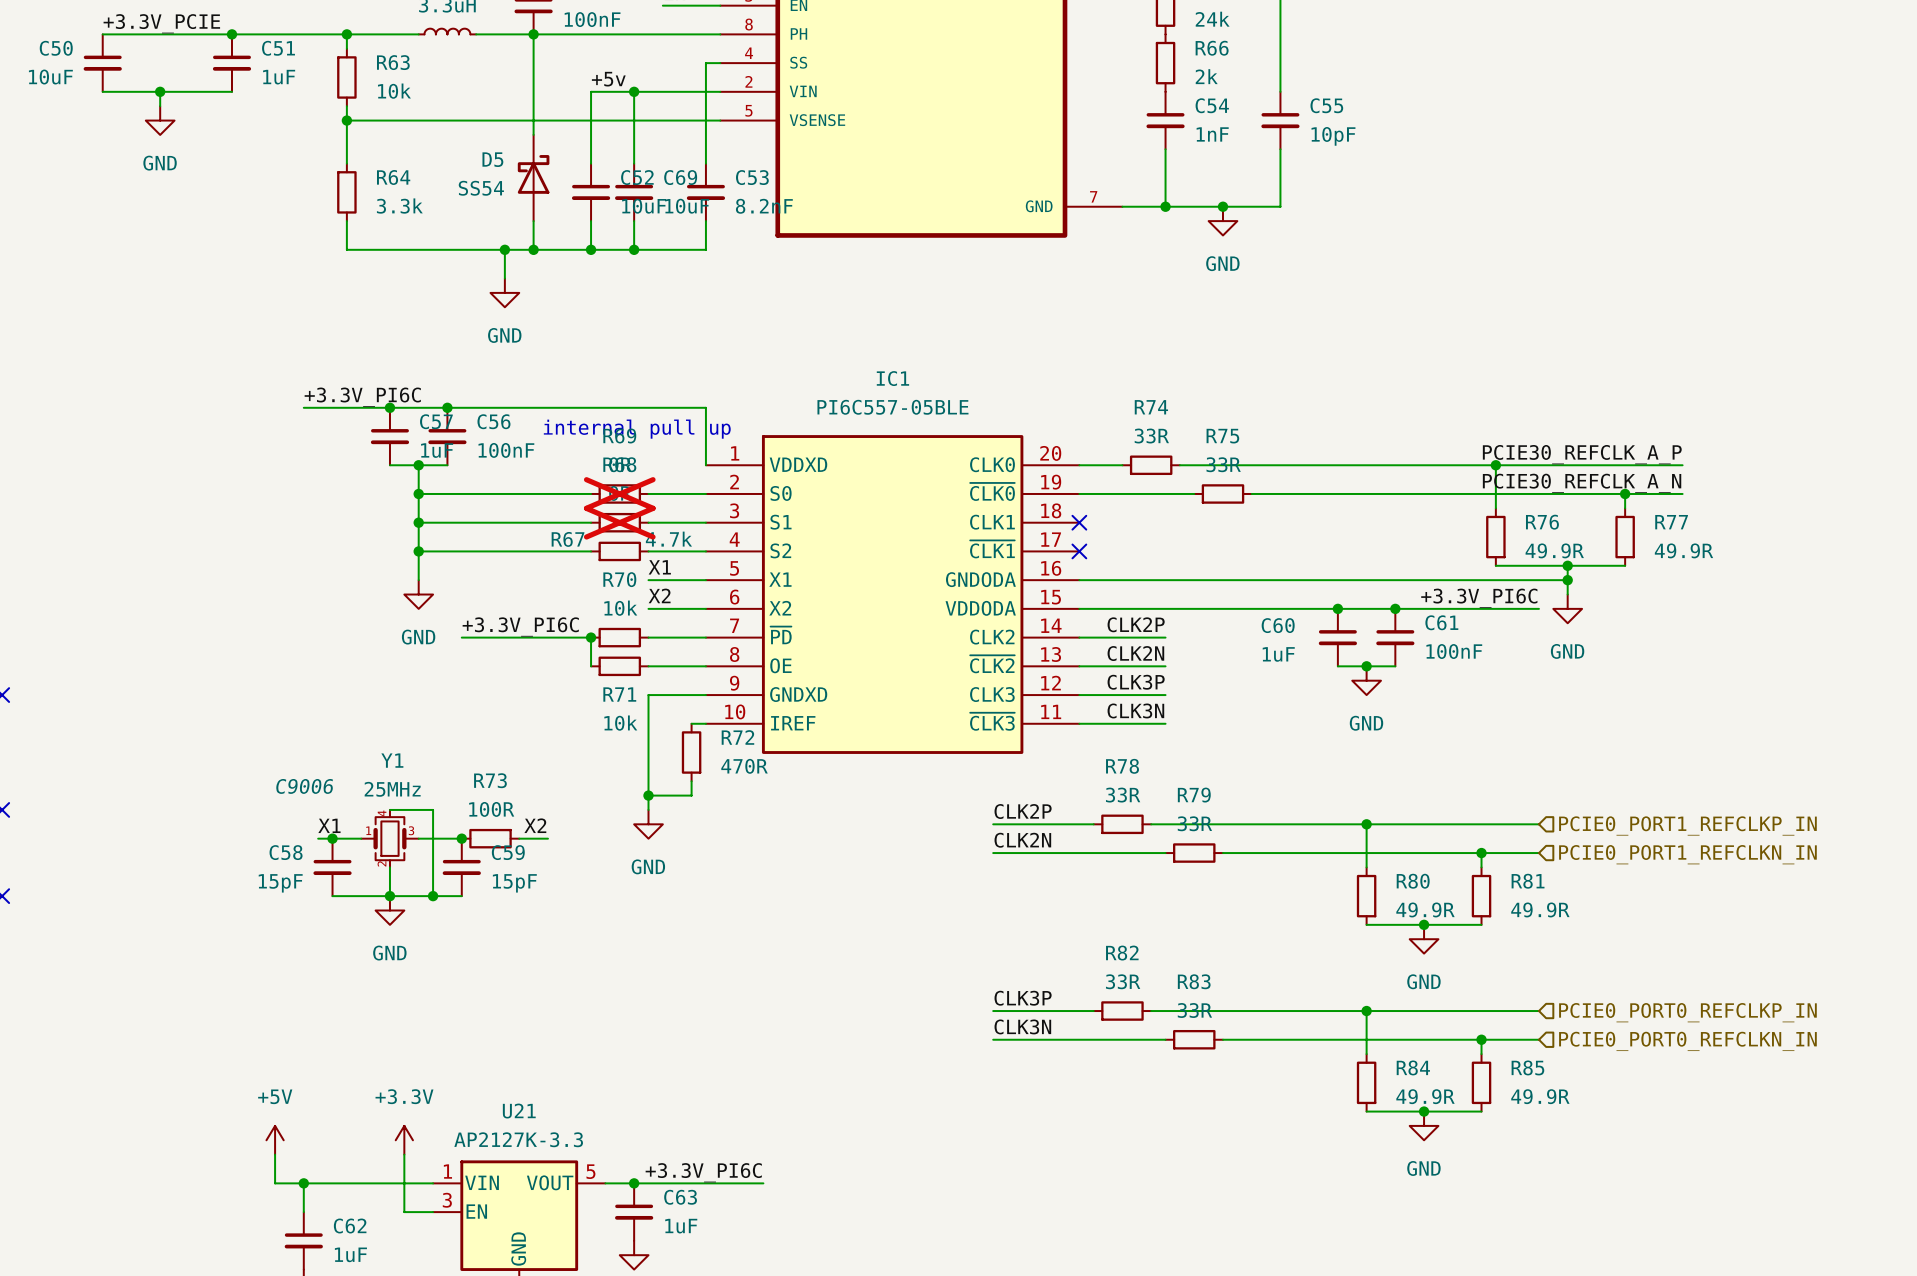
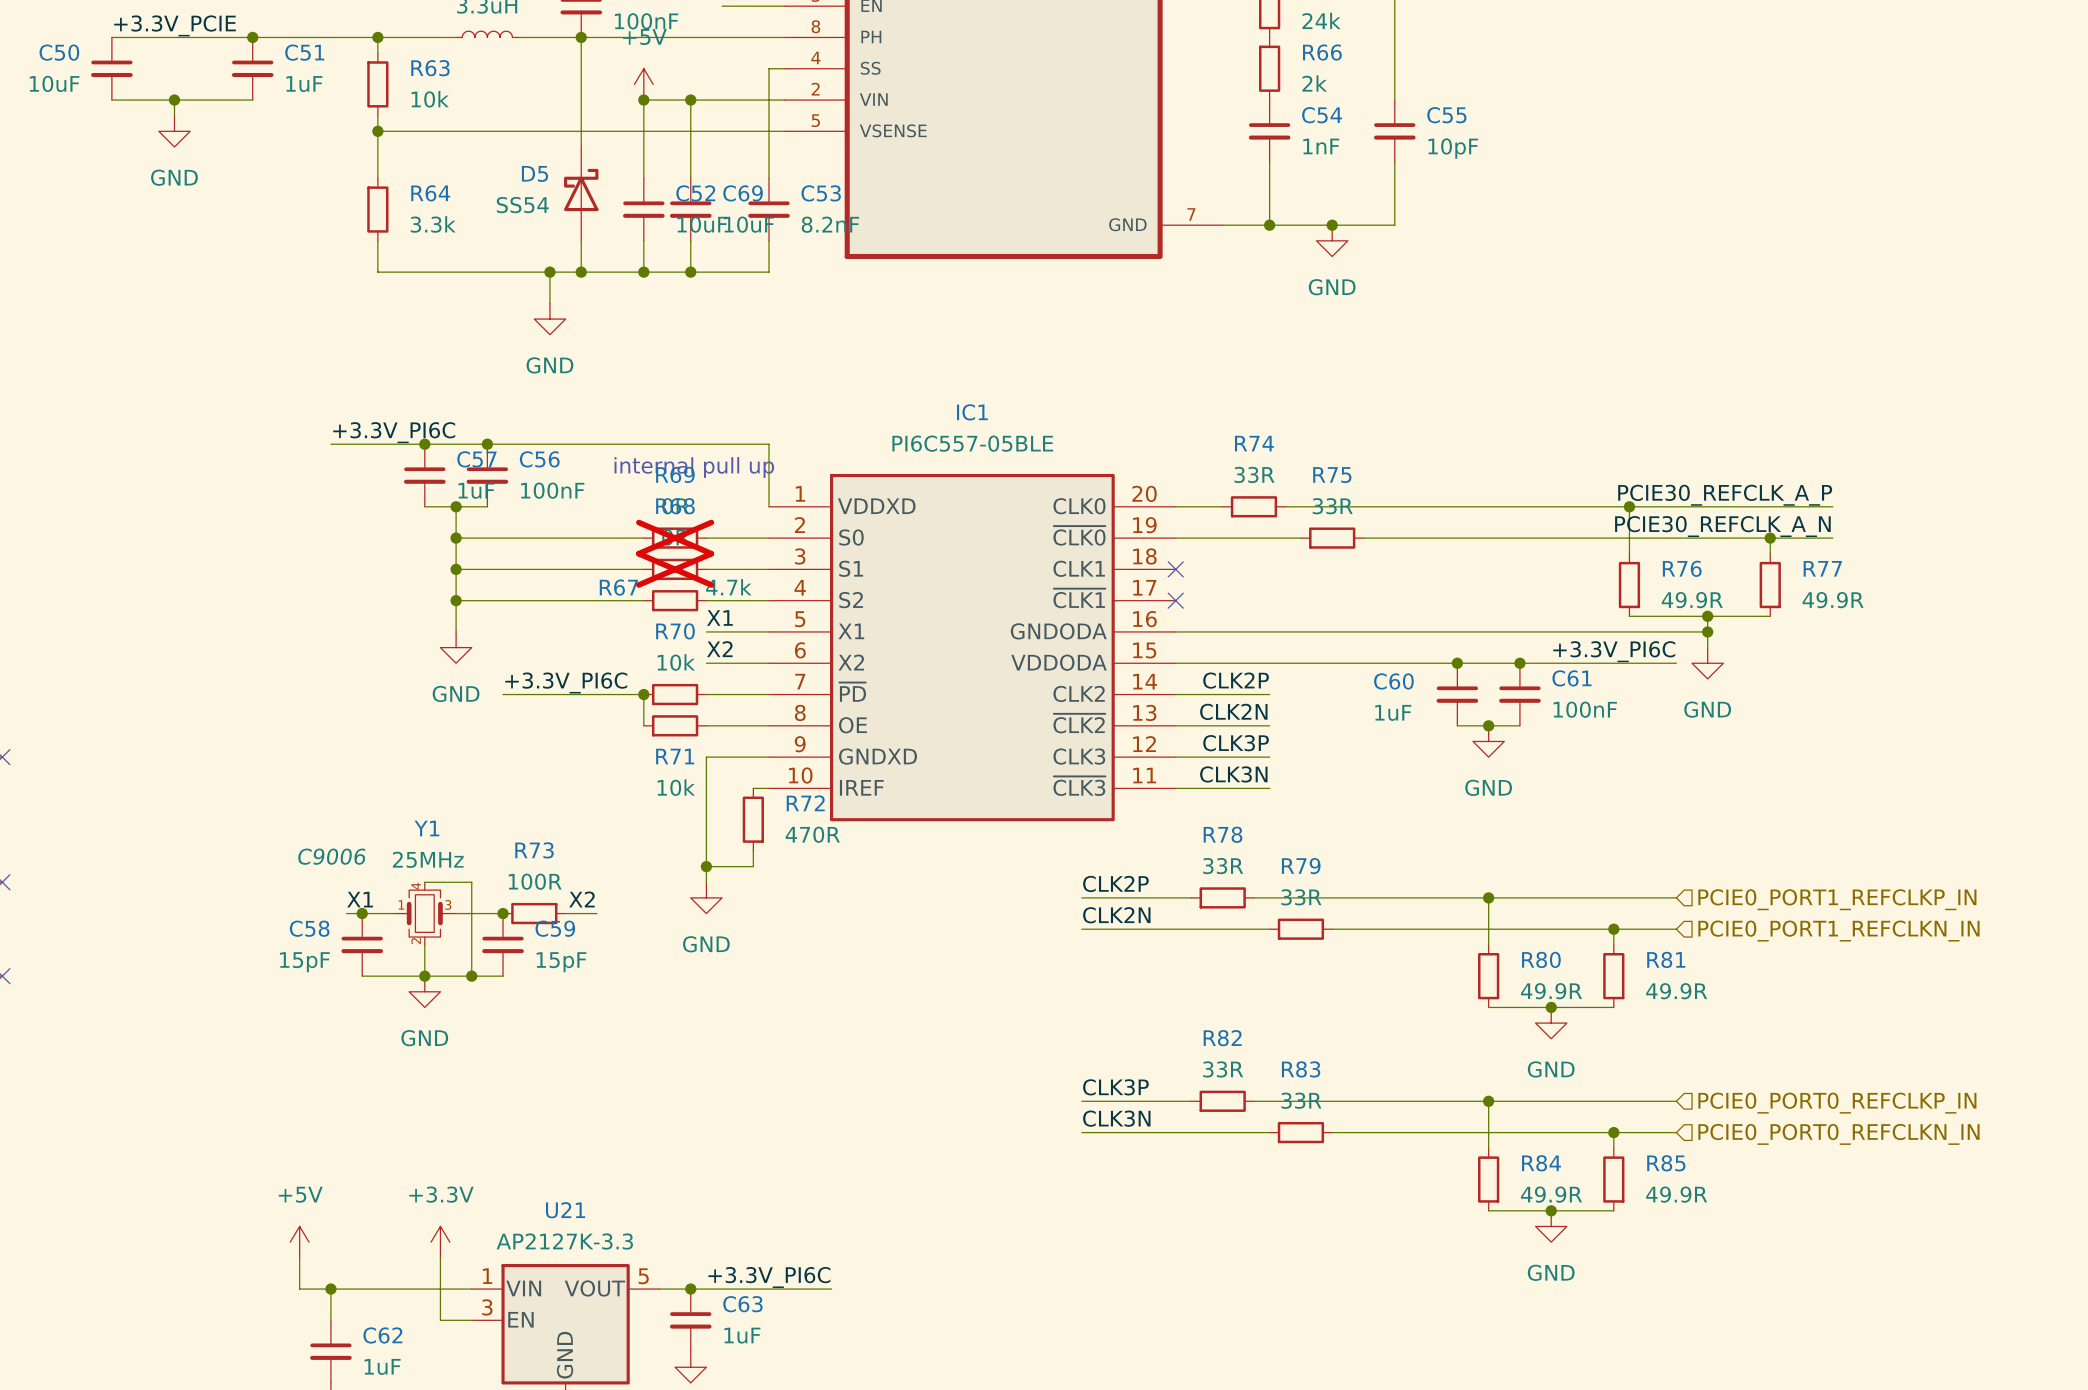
power symbol: none -> +5V (643, 84)
label: +5v (608, 79) -> none
junction: none -> (643, 100)

